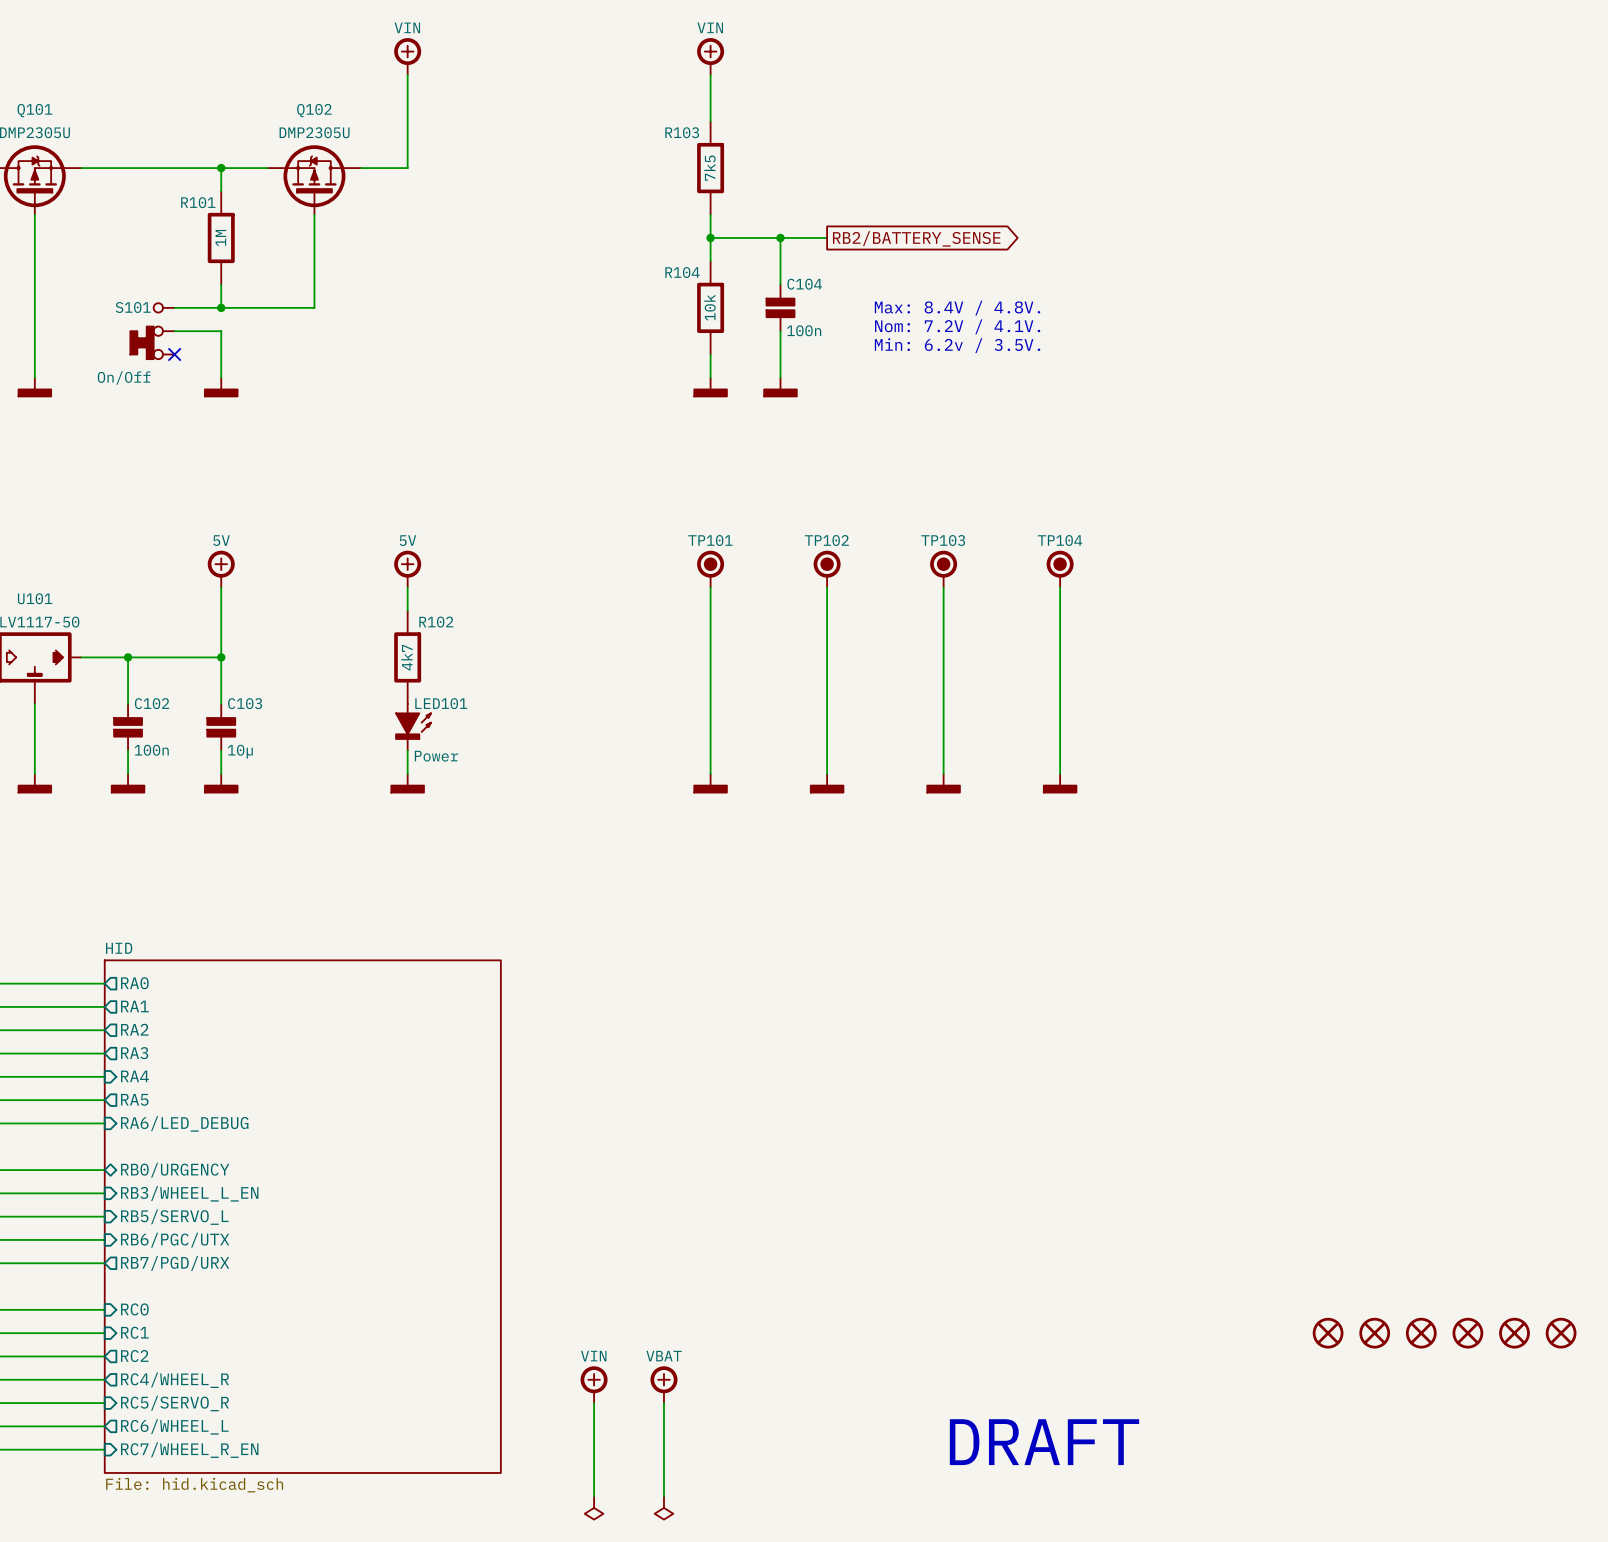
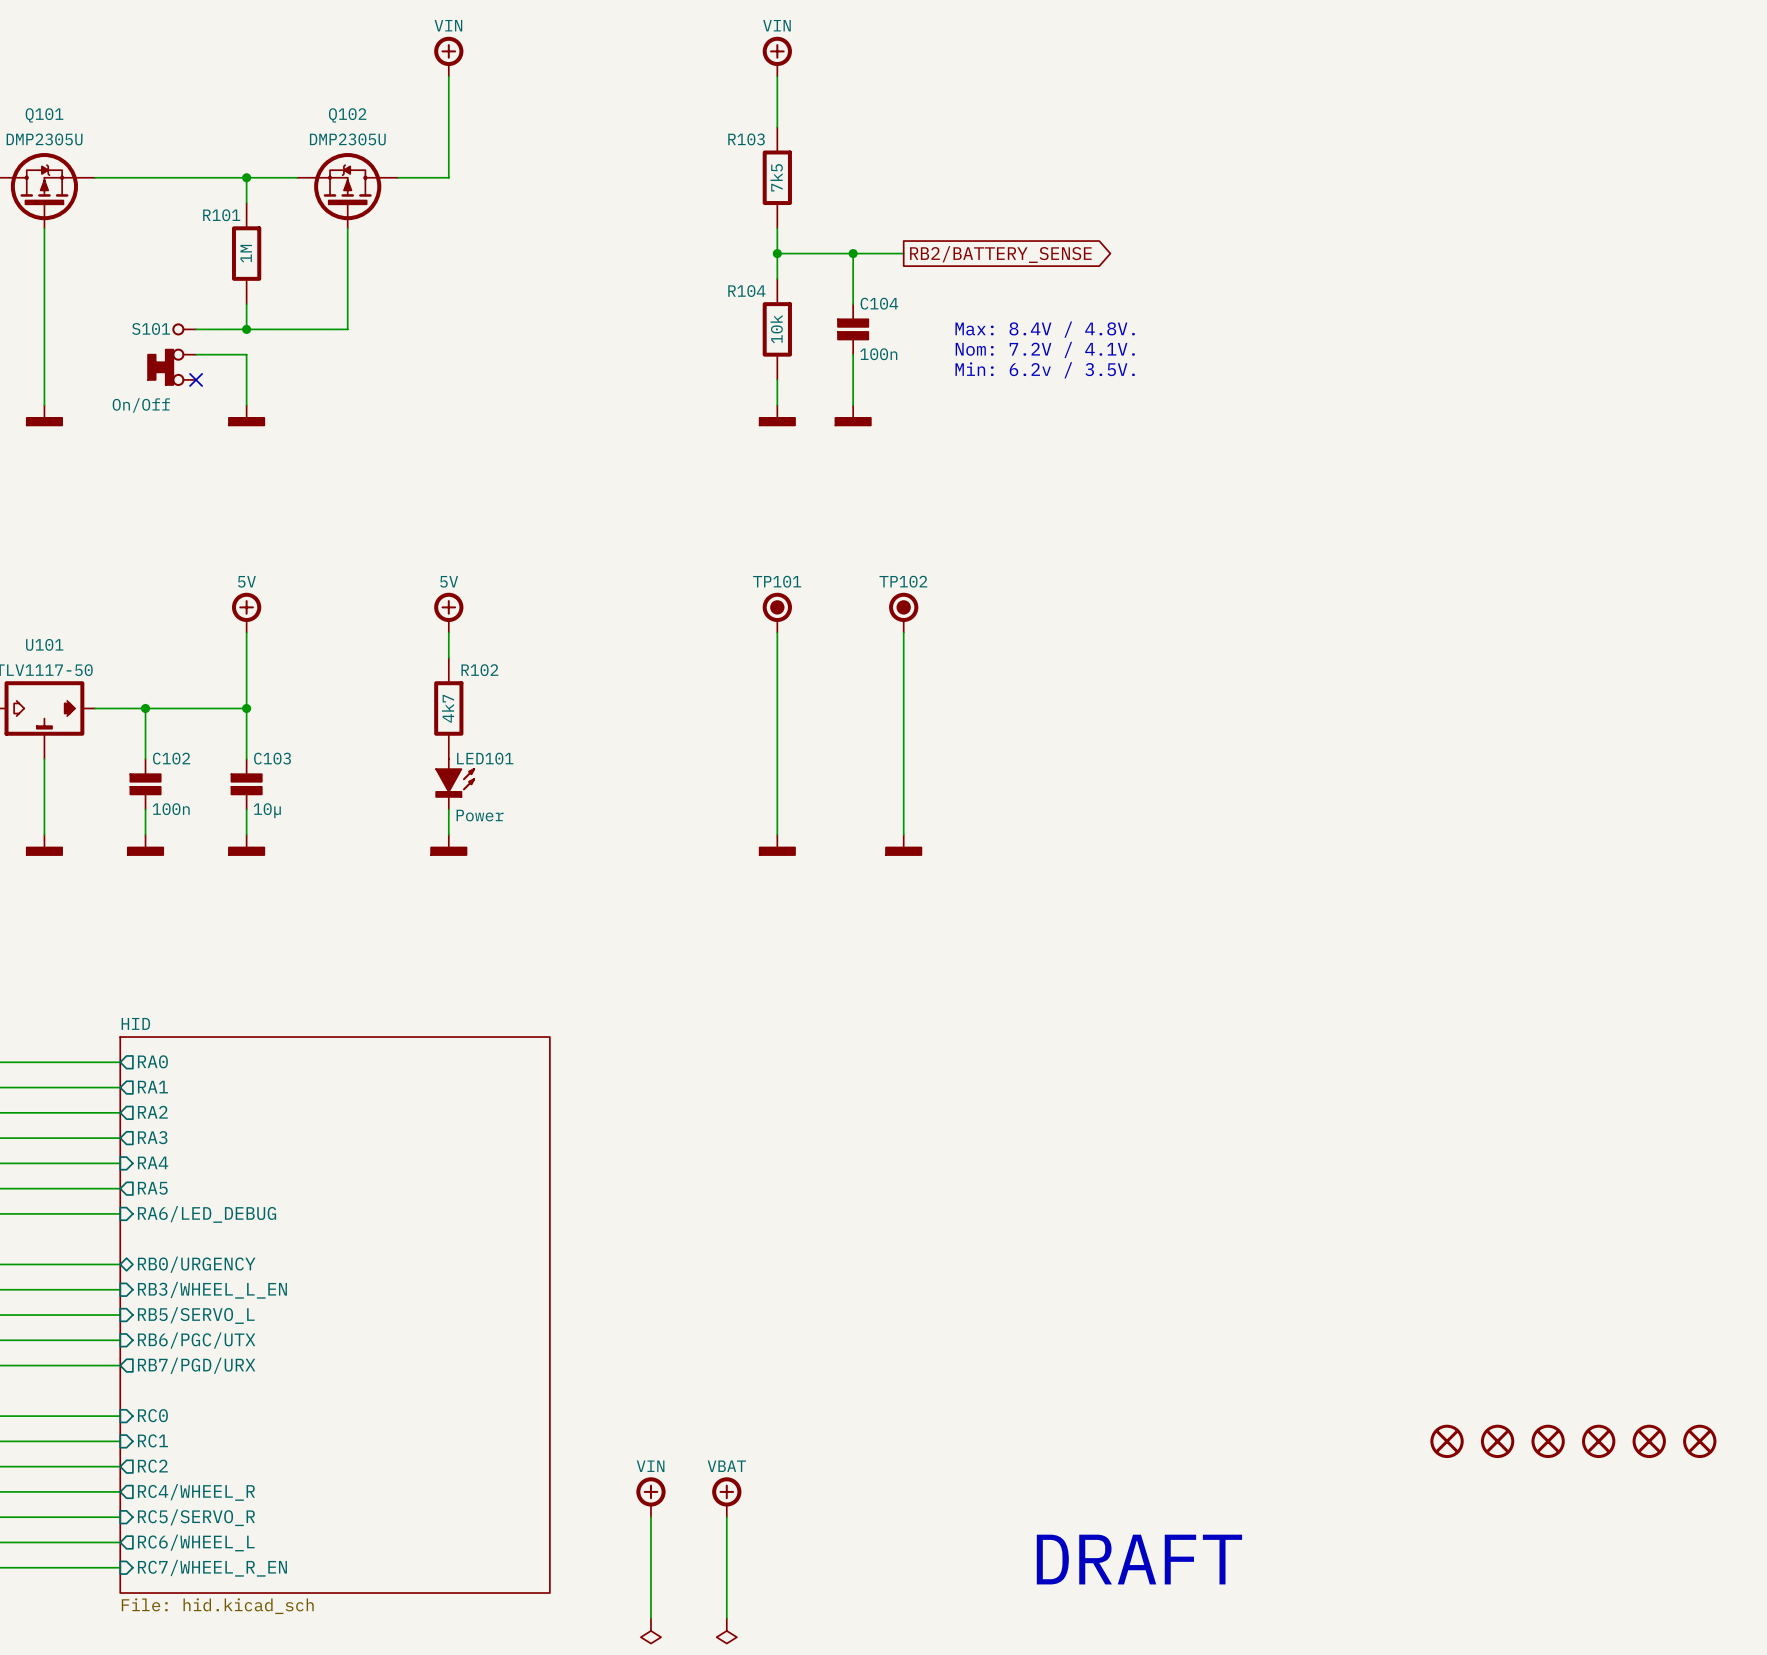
TP103: (943, 569) -> none
TP104: (1060, 569) -> none
wire: (943, 587) (943, 773) -> none
wire: (1060, 587) (1060, 773) -> none
power symbol: (943, 783) -> none
power symbol: (1060, 783) -> none

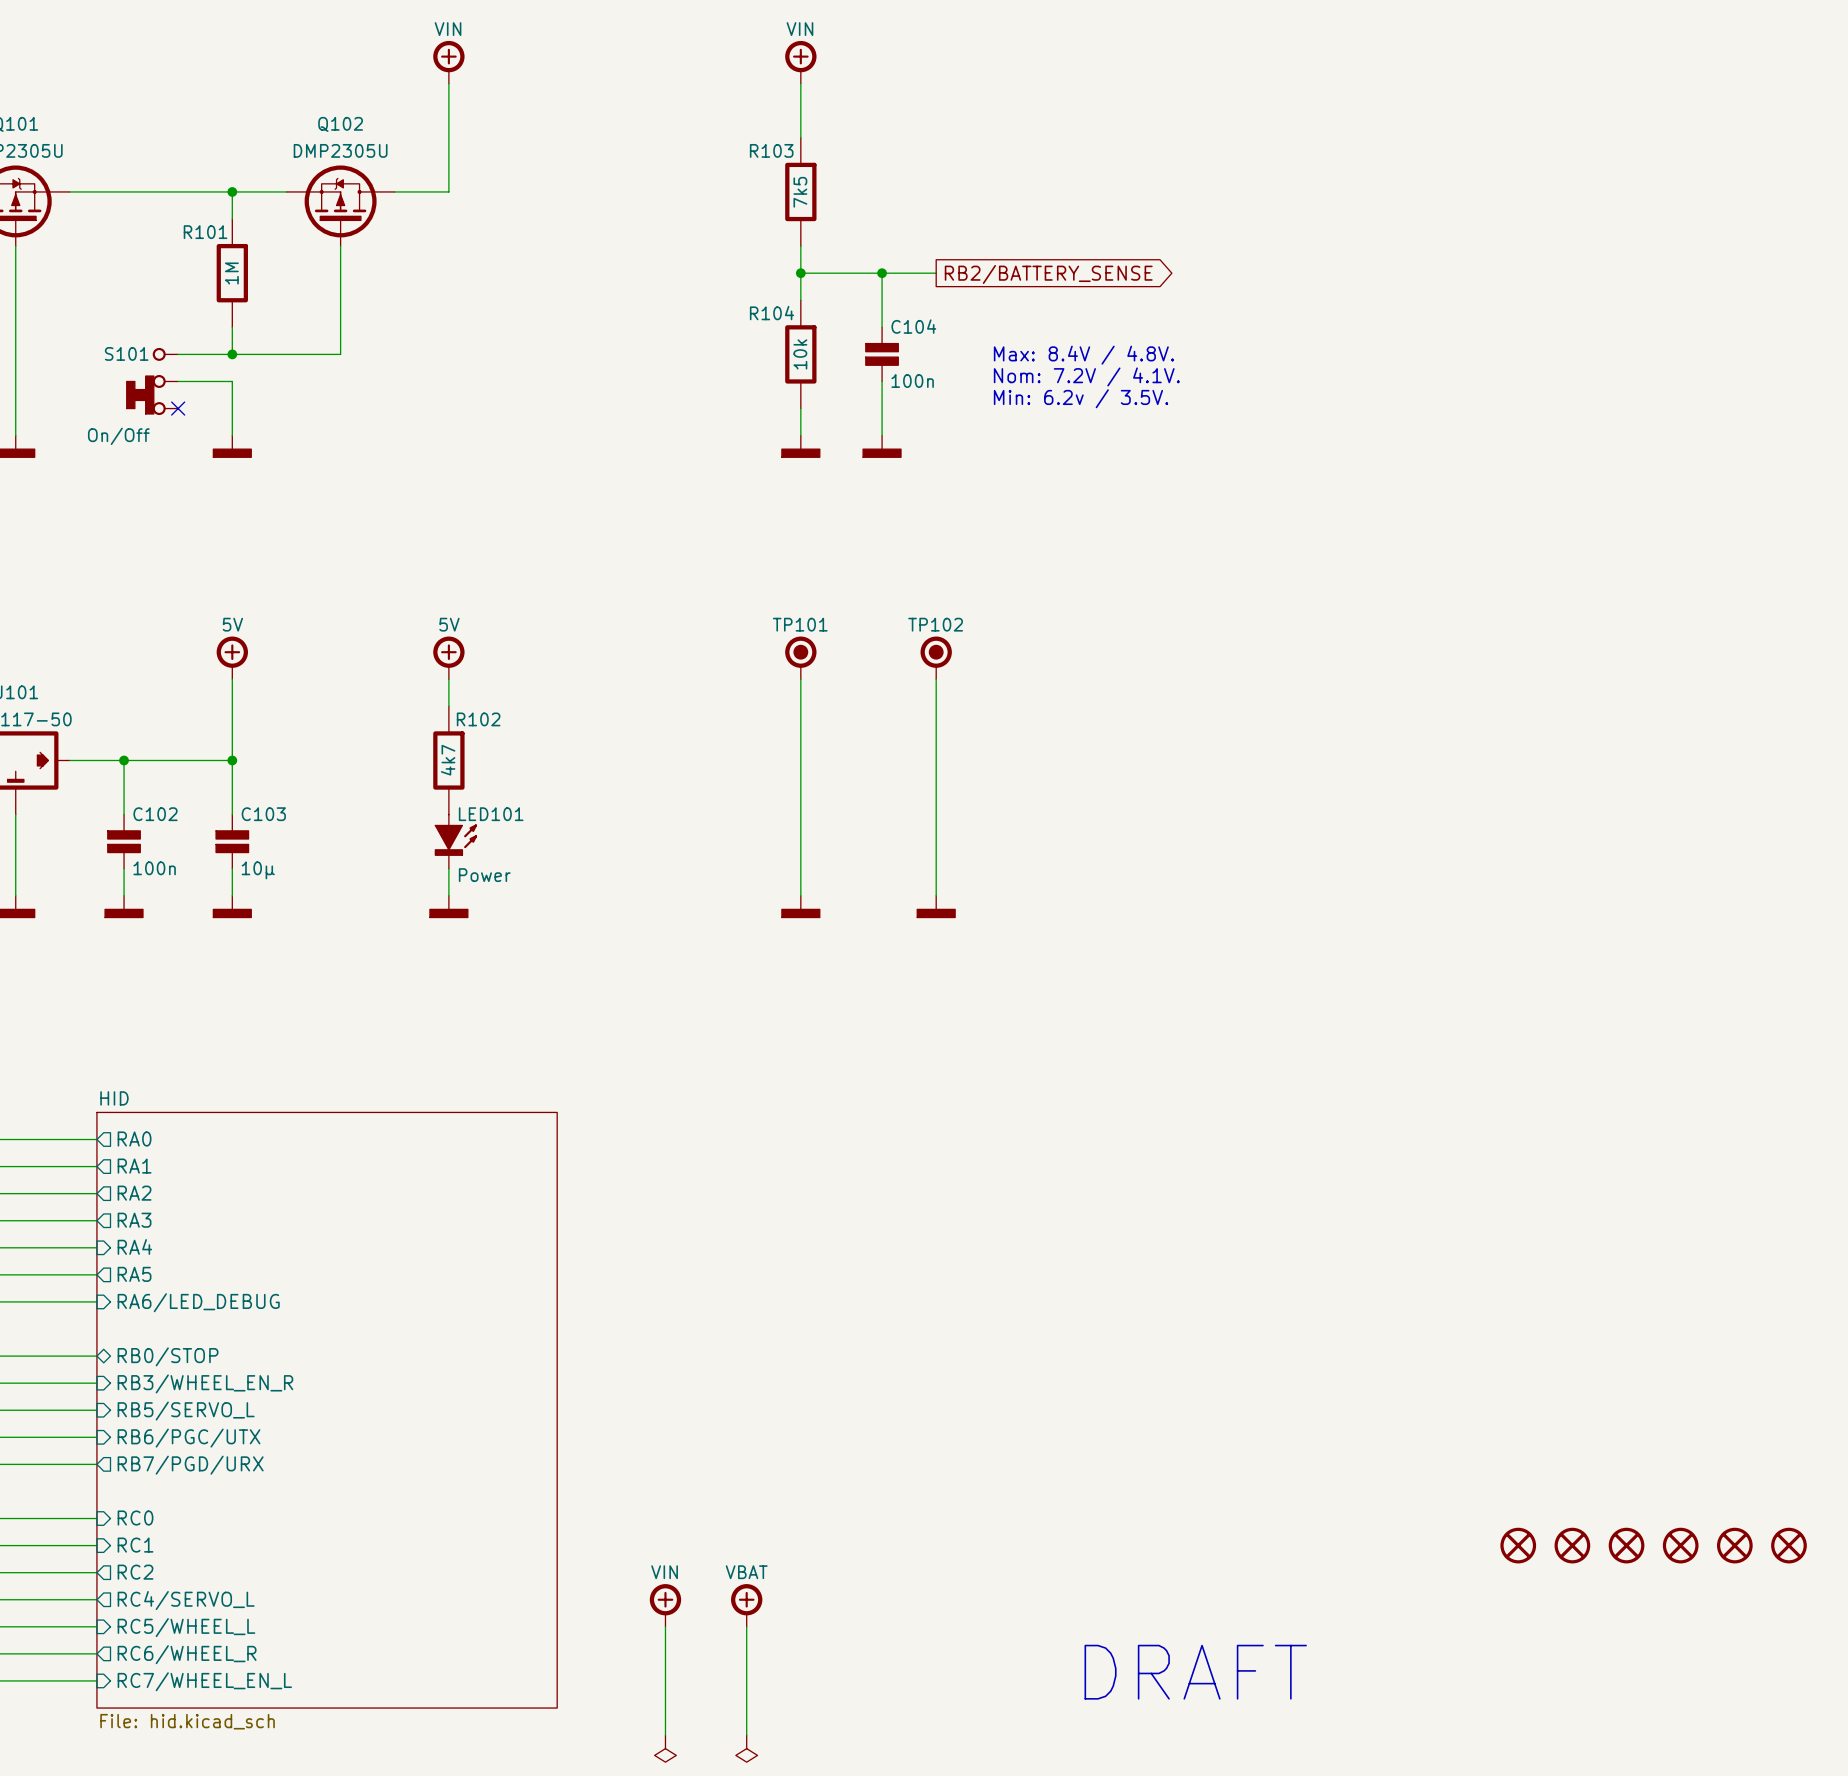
sheet pin: RB0/URGENCY (196, 1264) -> RB0/STOP (168, 1356)
sheet pin: RB3/WHEEL_L_EN (212, 1290) -> RB3/WHEEL_EN_R (205, 1383)
sheet pin: RC4/WHEEL_R (196, 1492) -> RC4/SERVO_L (186, 1600)
sheet pin: RC5/SERVO_R (196, 1517) -> RC5/WHEEL_L (186, 1627)
sheet pin: RC6/WHEEL_L (196, 1542) -> RC6/WHEEL_R (187, 1654)
sheet pin: RC7/WHEEL_R_EN (212, 1568) -> RC7/WHEEL_EN_L (204, 1681)

